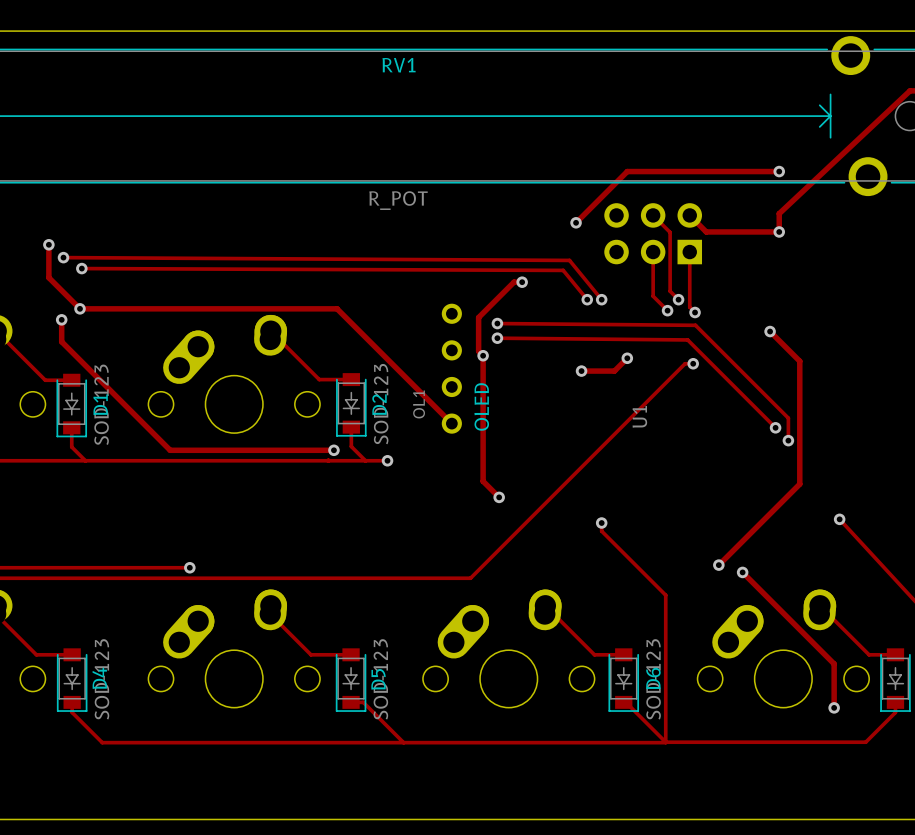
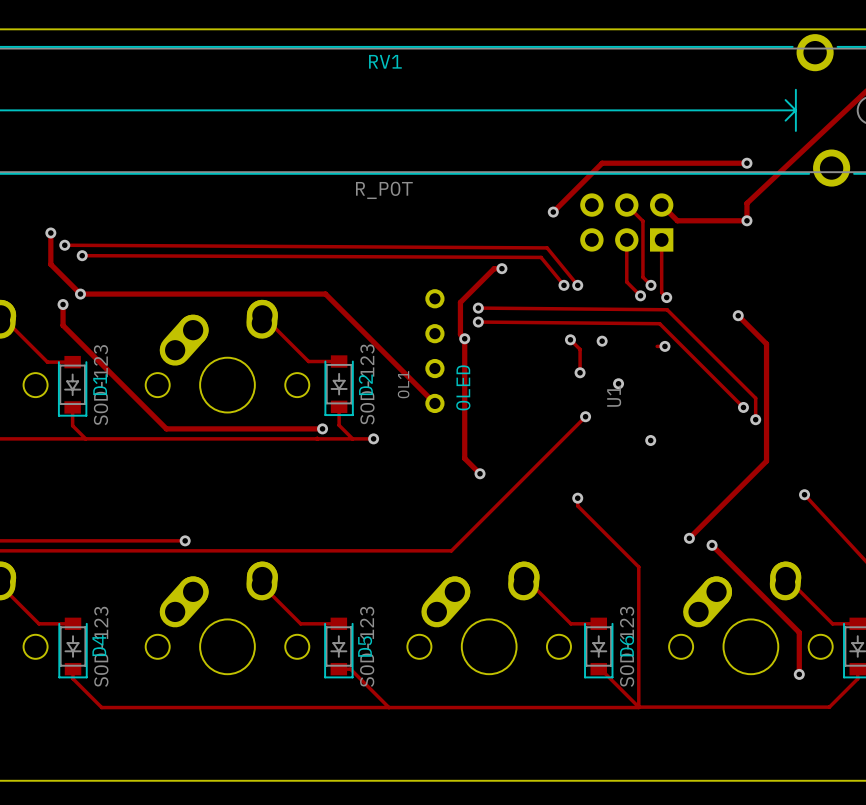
track: none -> (570, 339) (580, 349) (580, 372)
via: none -> (570, 339)
track: (627, 358) (614, 371) (581, 371) -> none
track: (685, 363) (469, 578) -> (585, 416) (451, 550)
via: (581, 371) -> none
via: none -> (580, 372)
via: none -> (618, 383)
via: none -> (585, 416)
via: none -> (650, 440)

